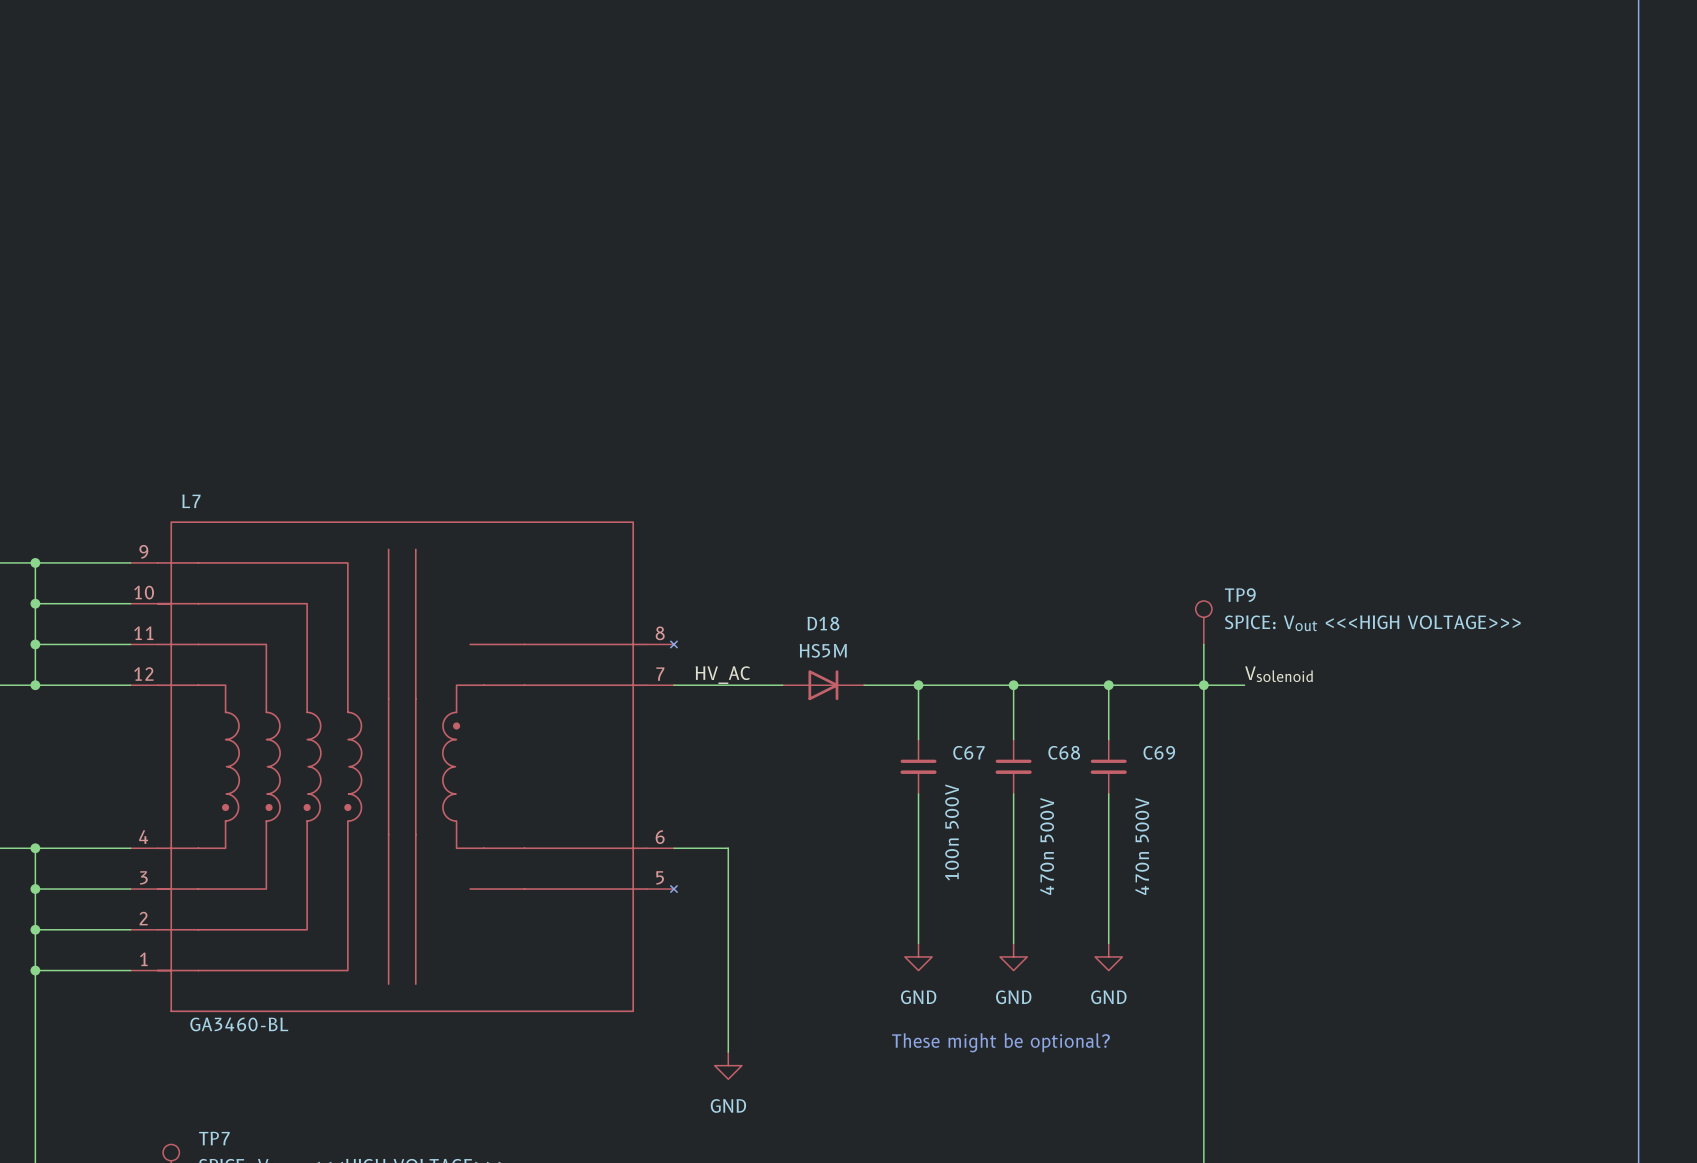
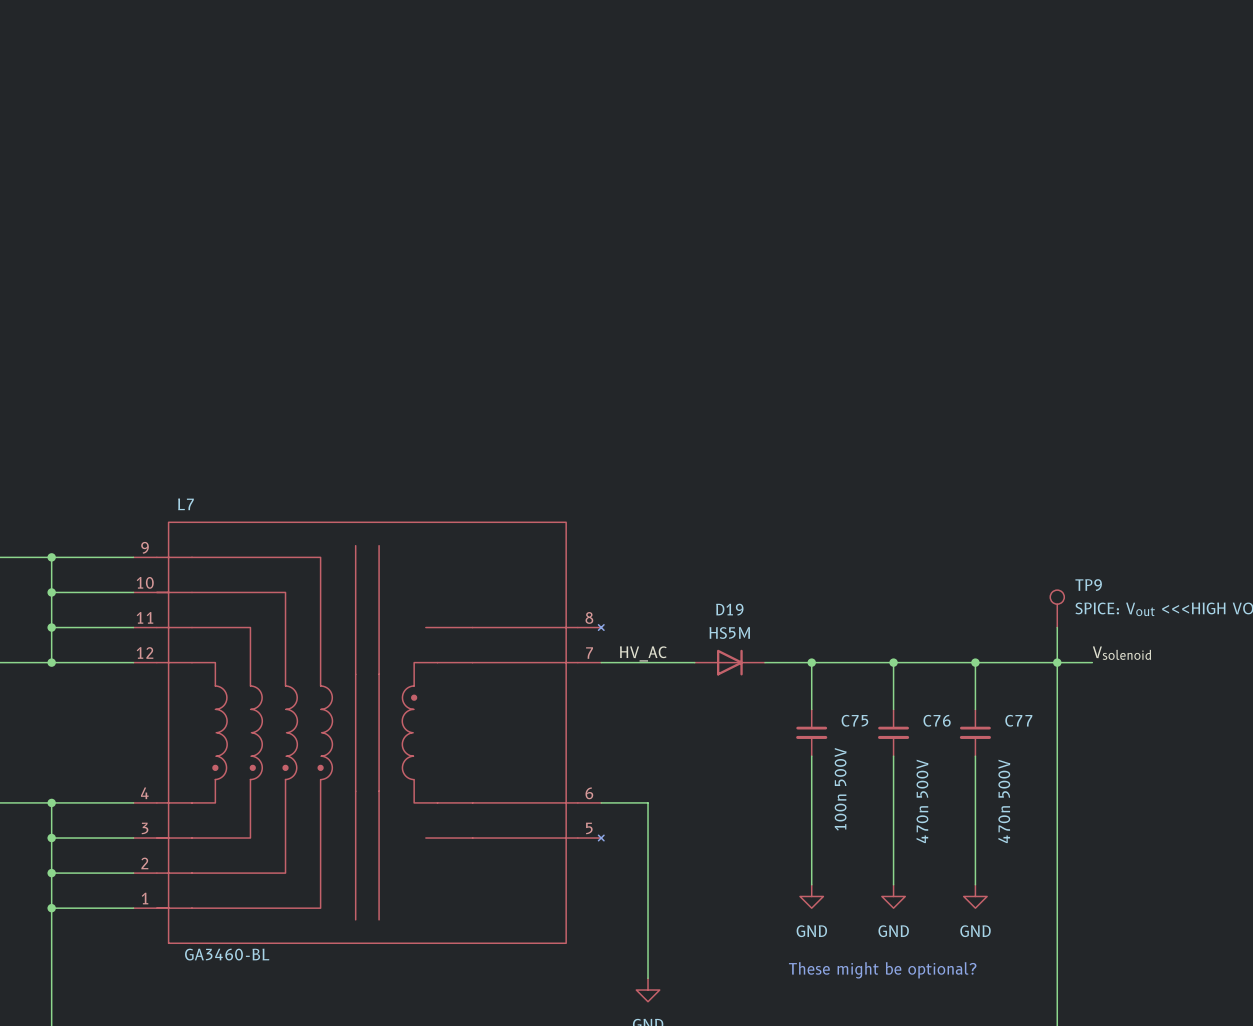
D18 name: D18 (823, 623) -> D19 (729, 609)
C67 name: C67 (968, 752) -> C75 (854, 720)
C68 name: C68 (1064, 752) -> C76 (937, 720)
C69 name: C69 (1159, 752) -> C77 (1018, 720)

